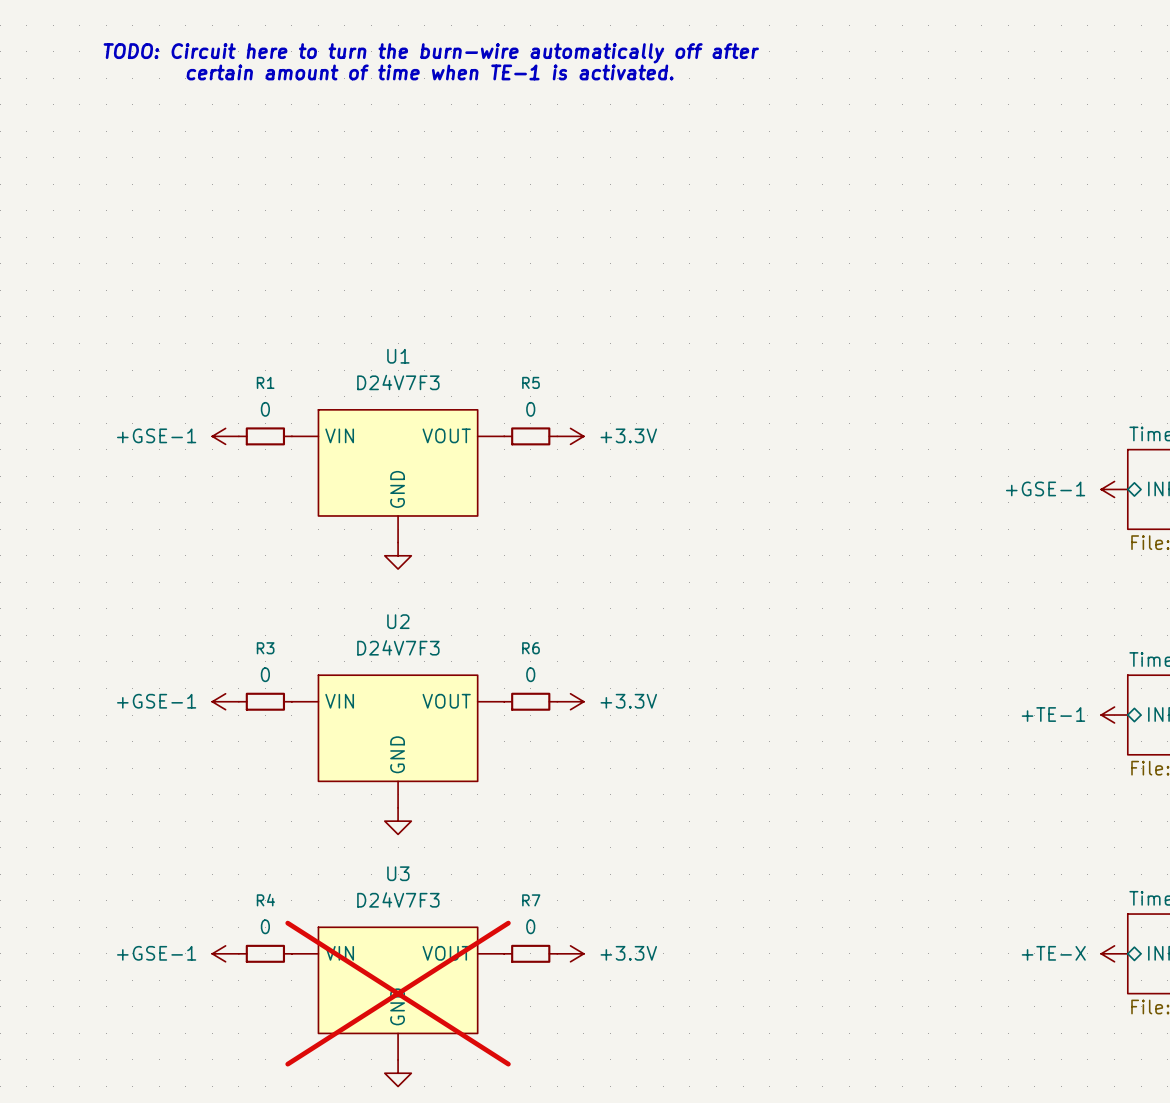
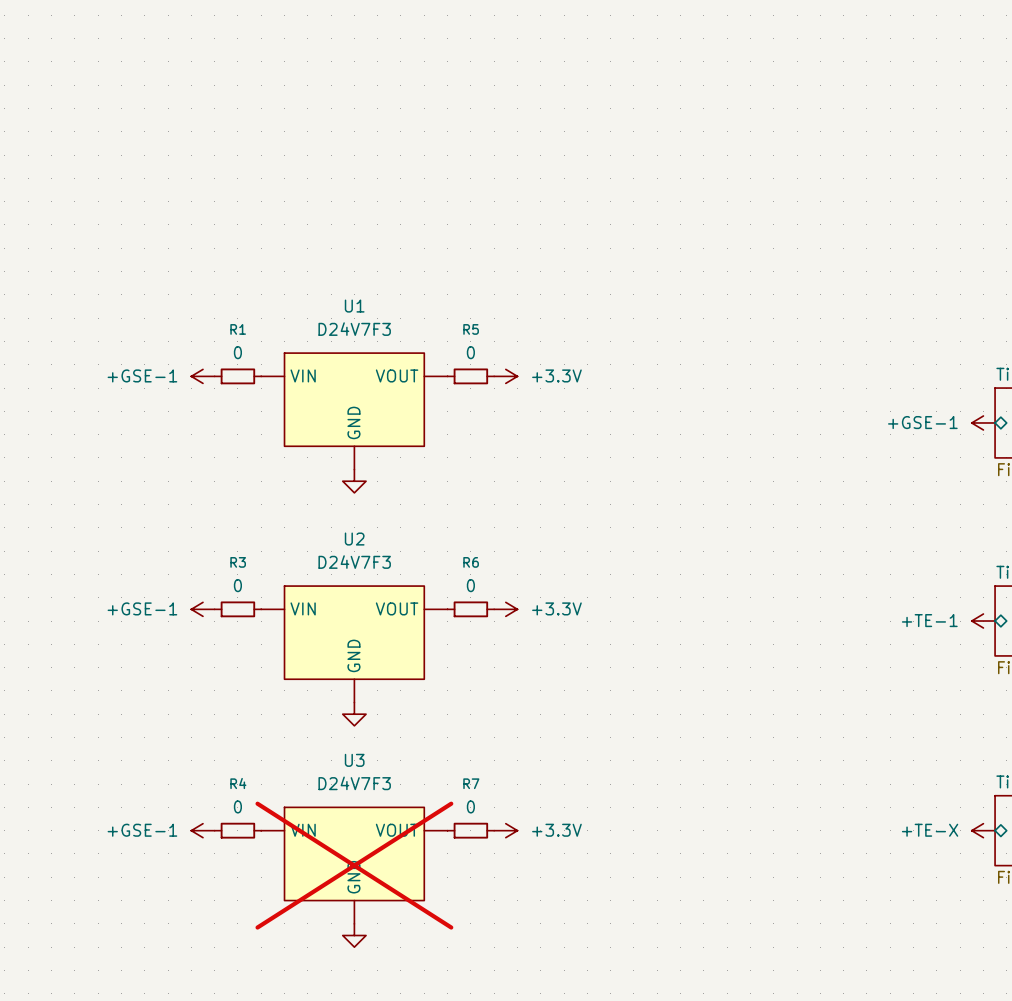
text: TODO: Circuit here to turn the burn-wire automatically off after (431, 53) -> none
text: certain amount of time when TE-1 is activated. (430, 72) -> none

